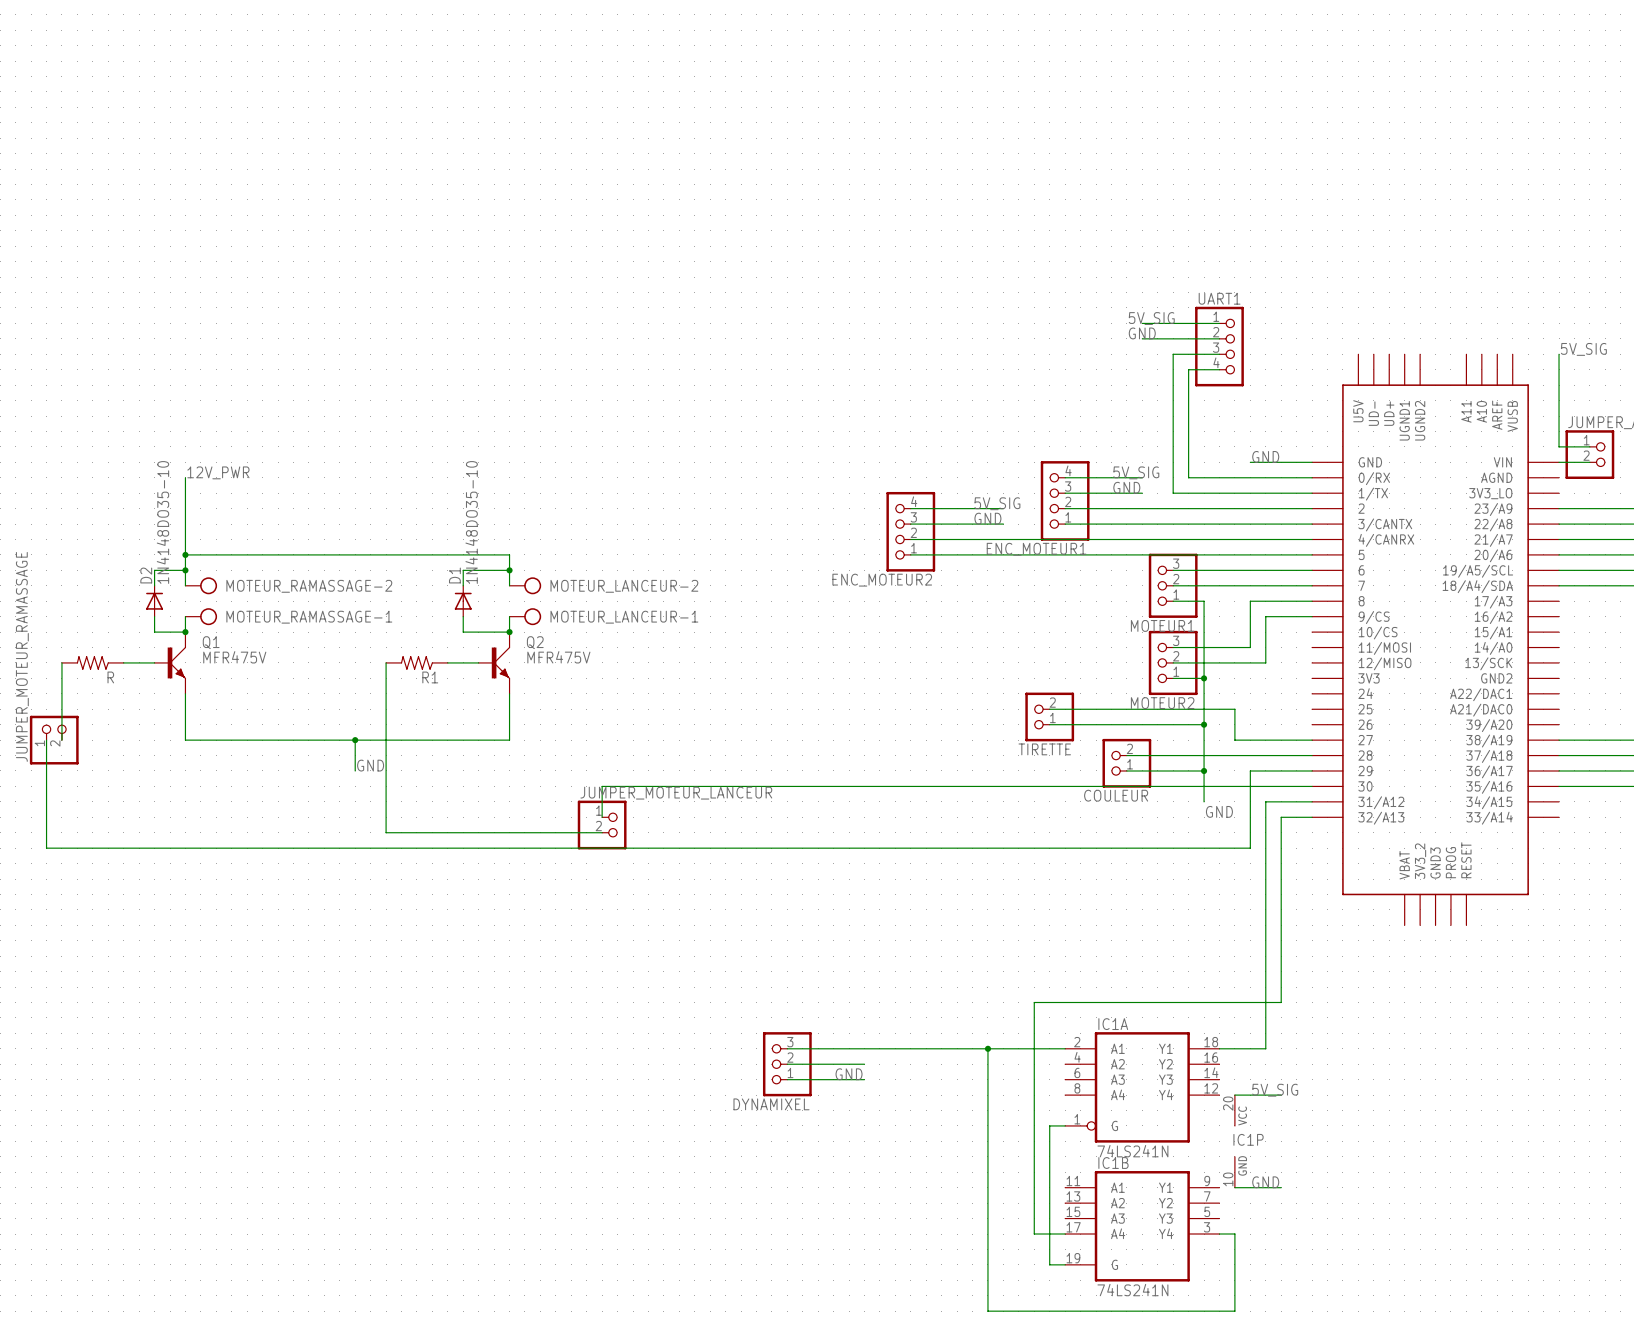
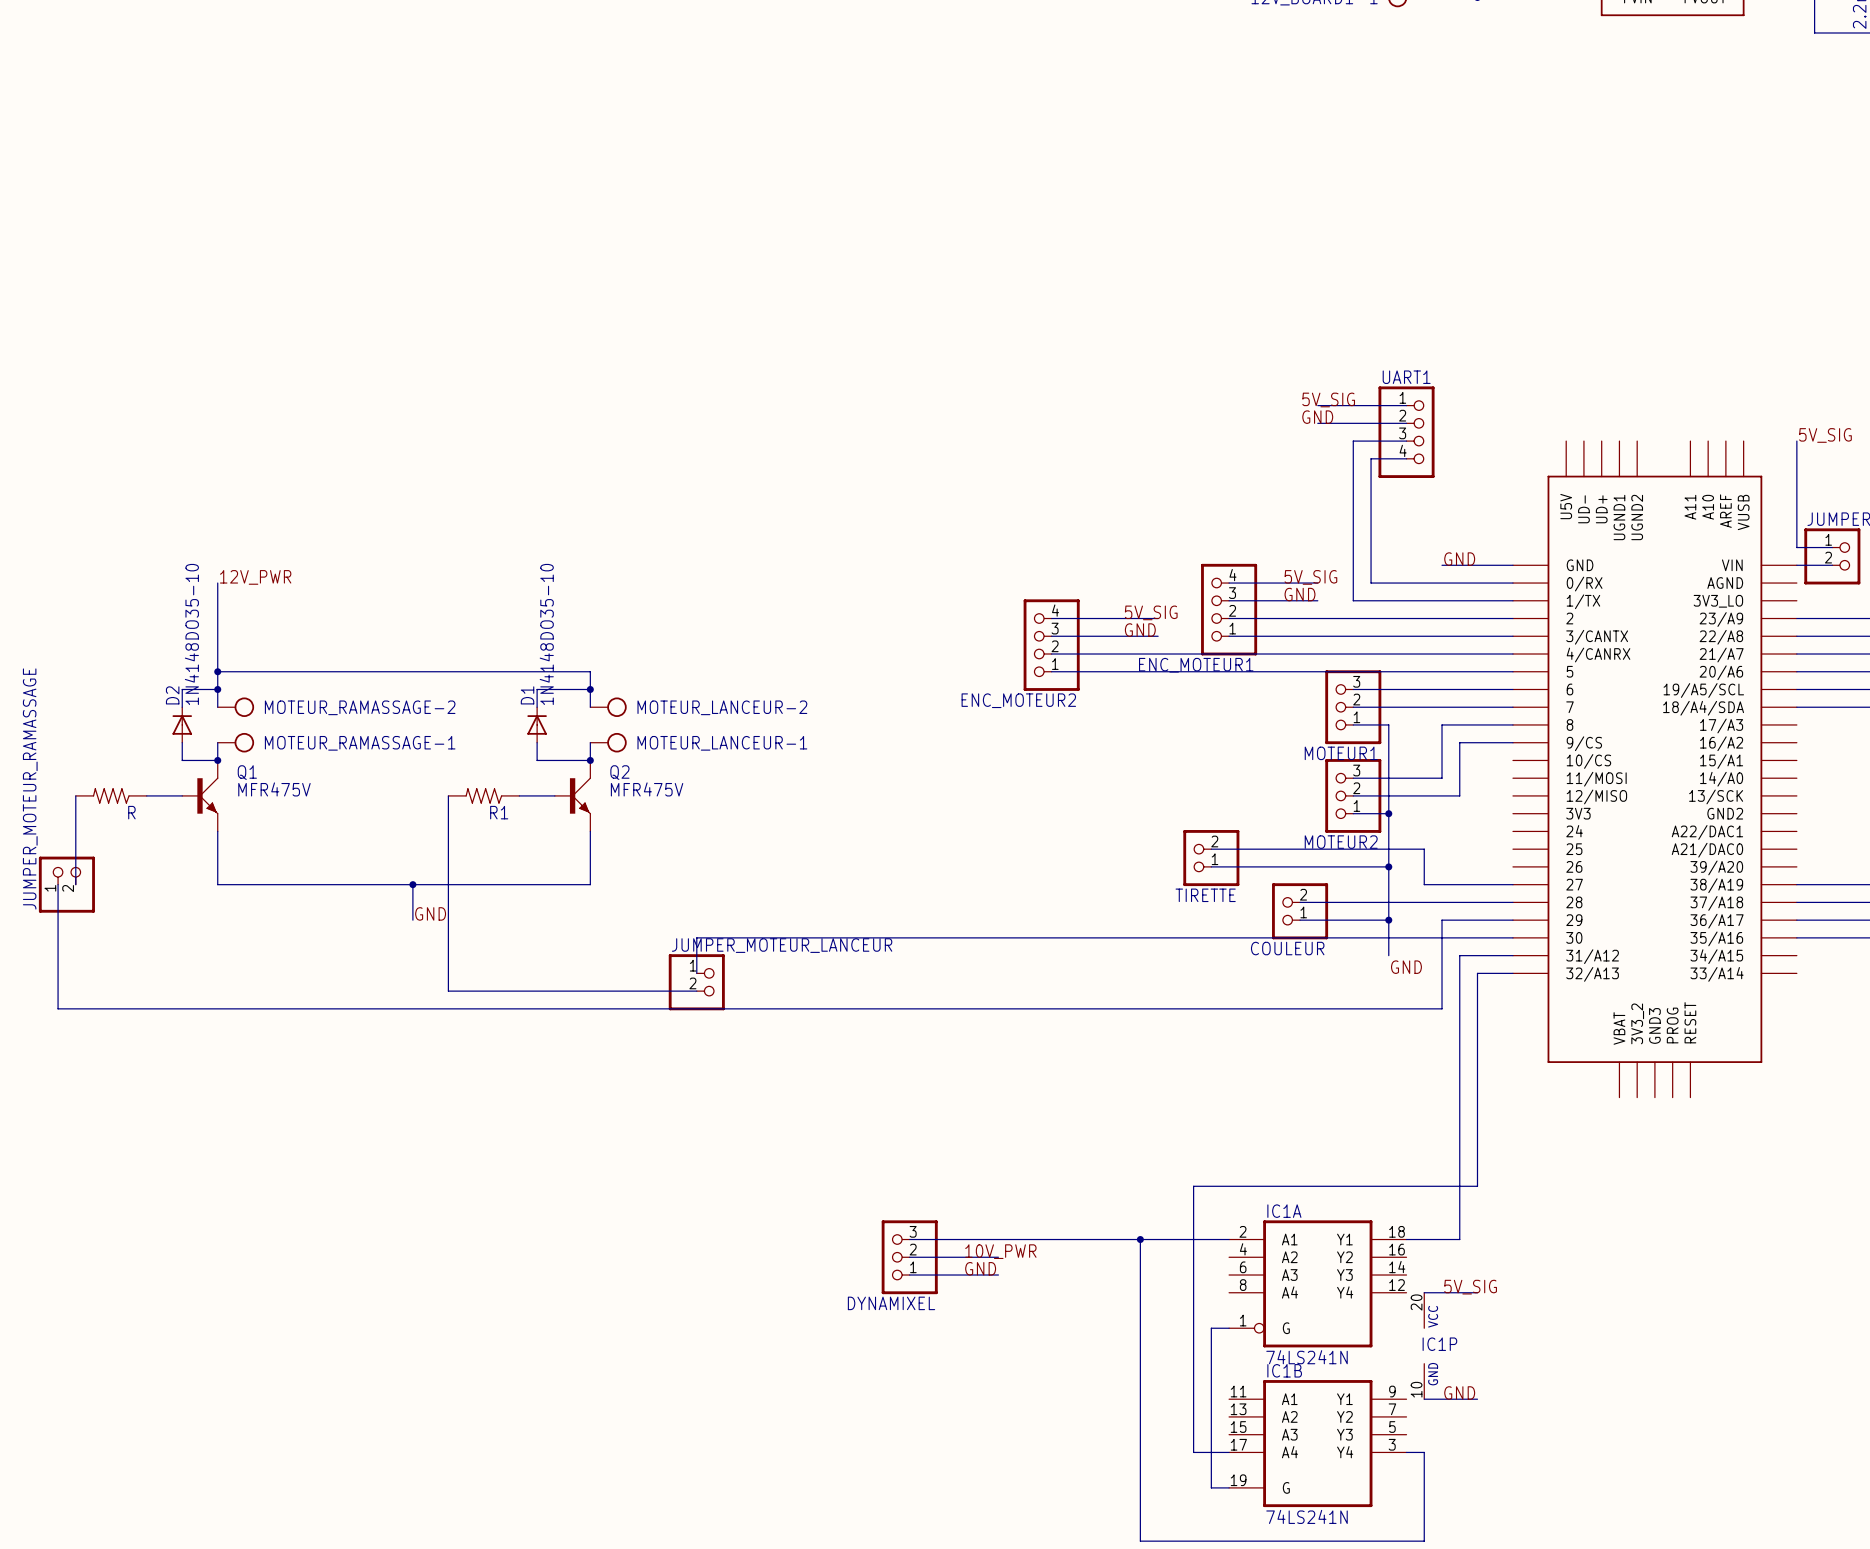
label: none -> 10V_PWR (1000, 1251)

